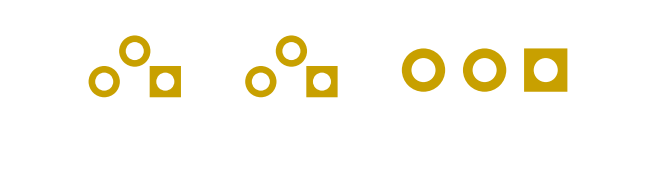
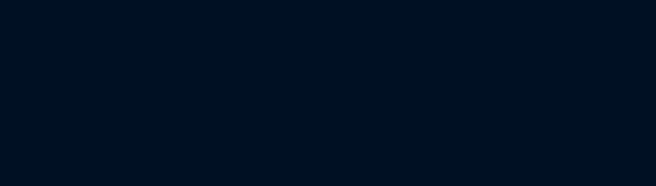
part: (134, 66) -> none
part: (291, 66) -> none
part: (484, 70) -> none

